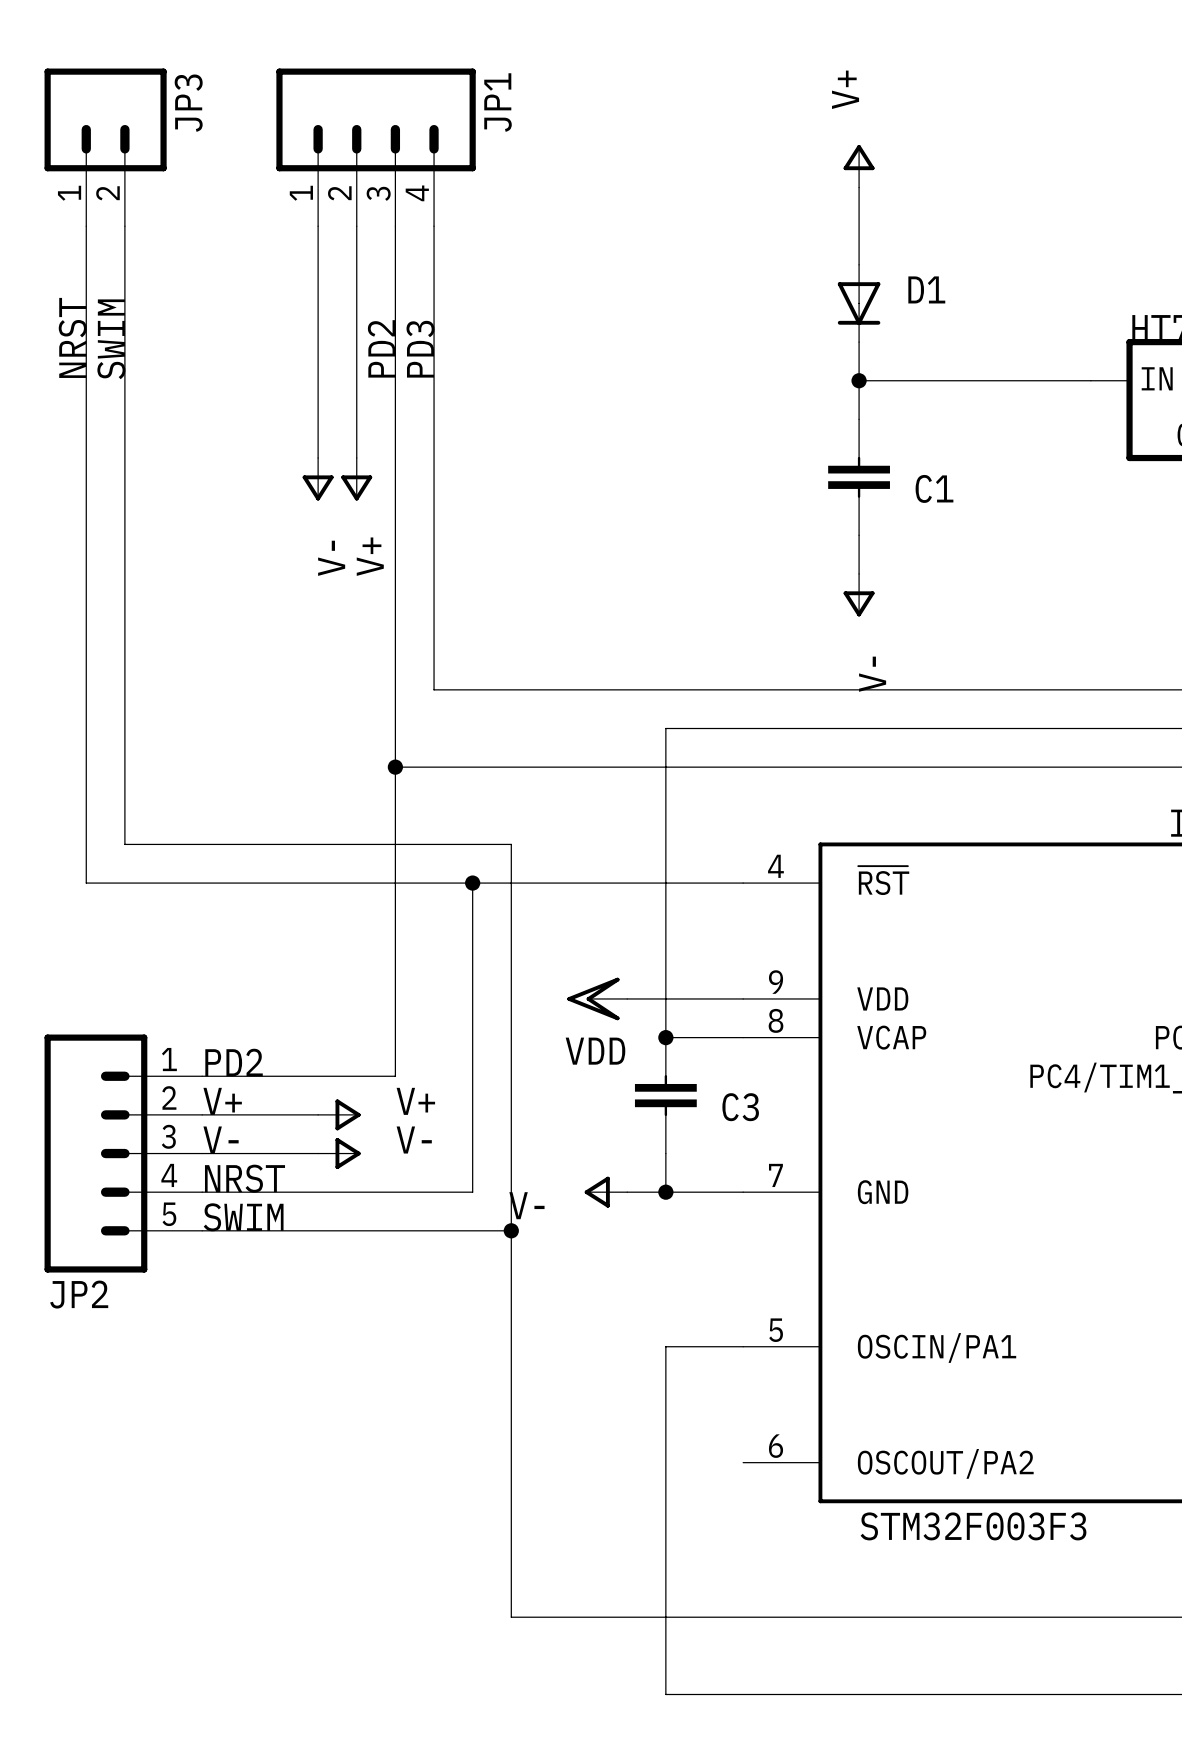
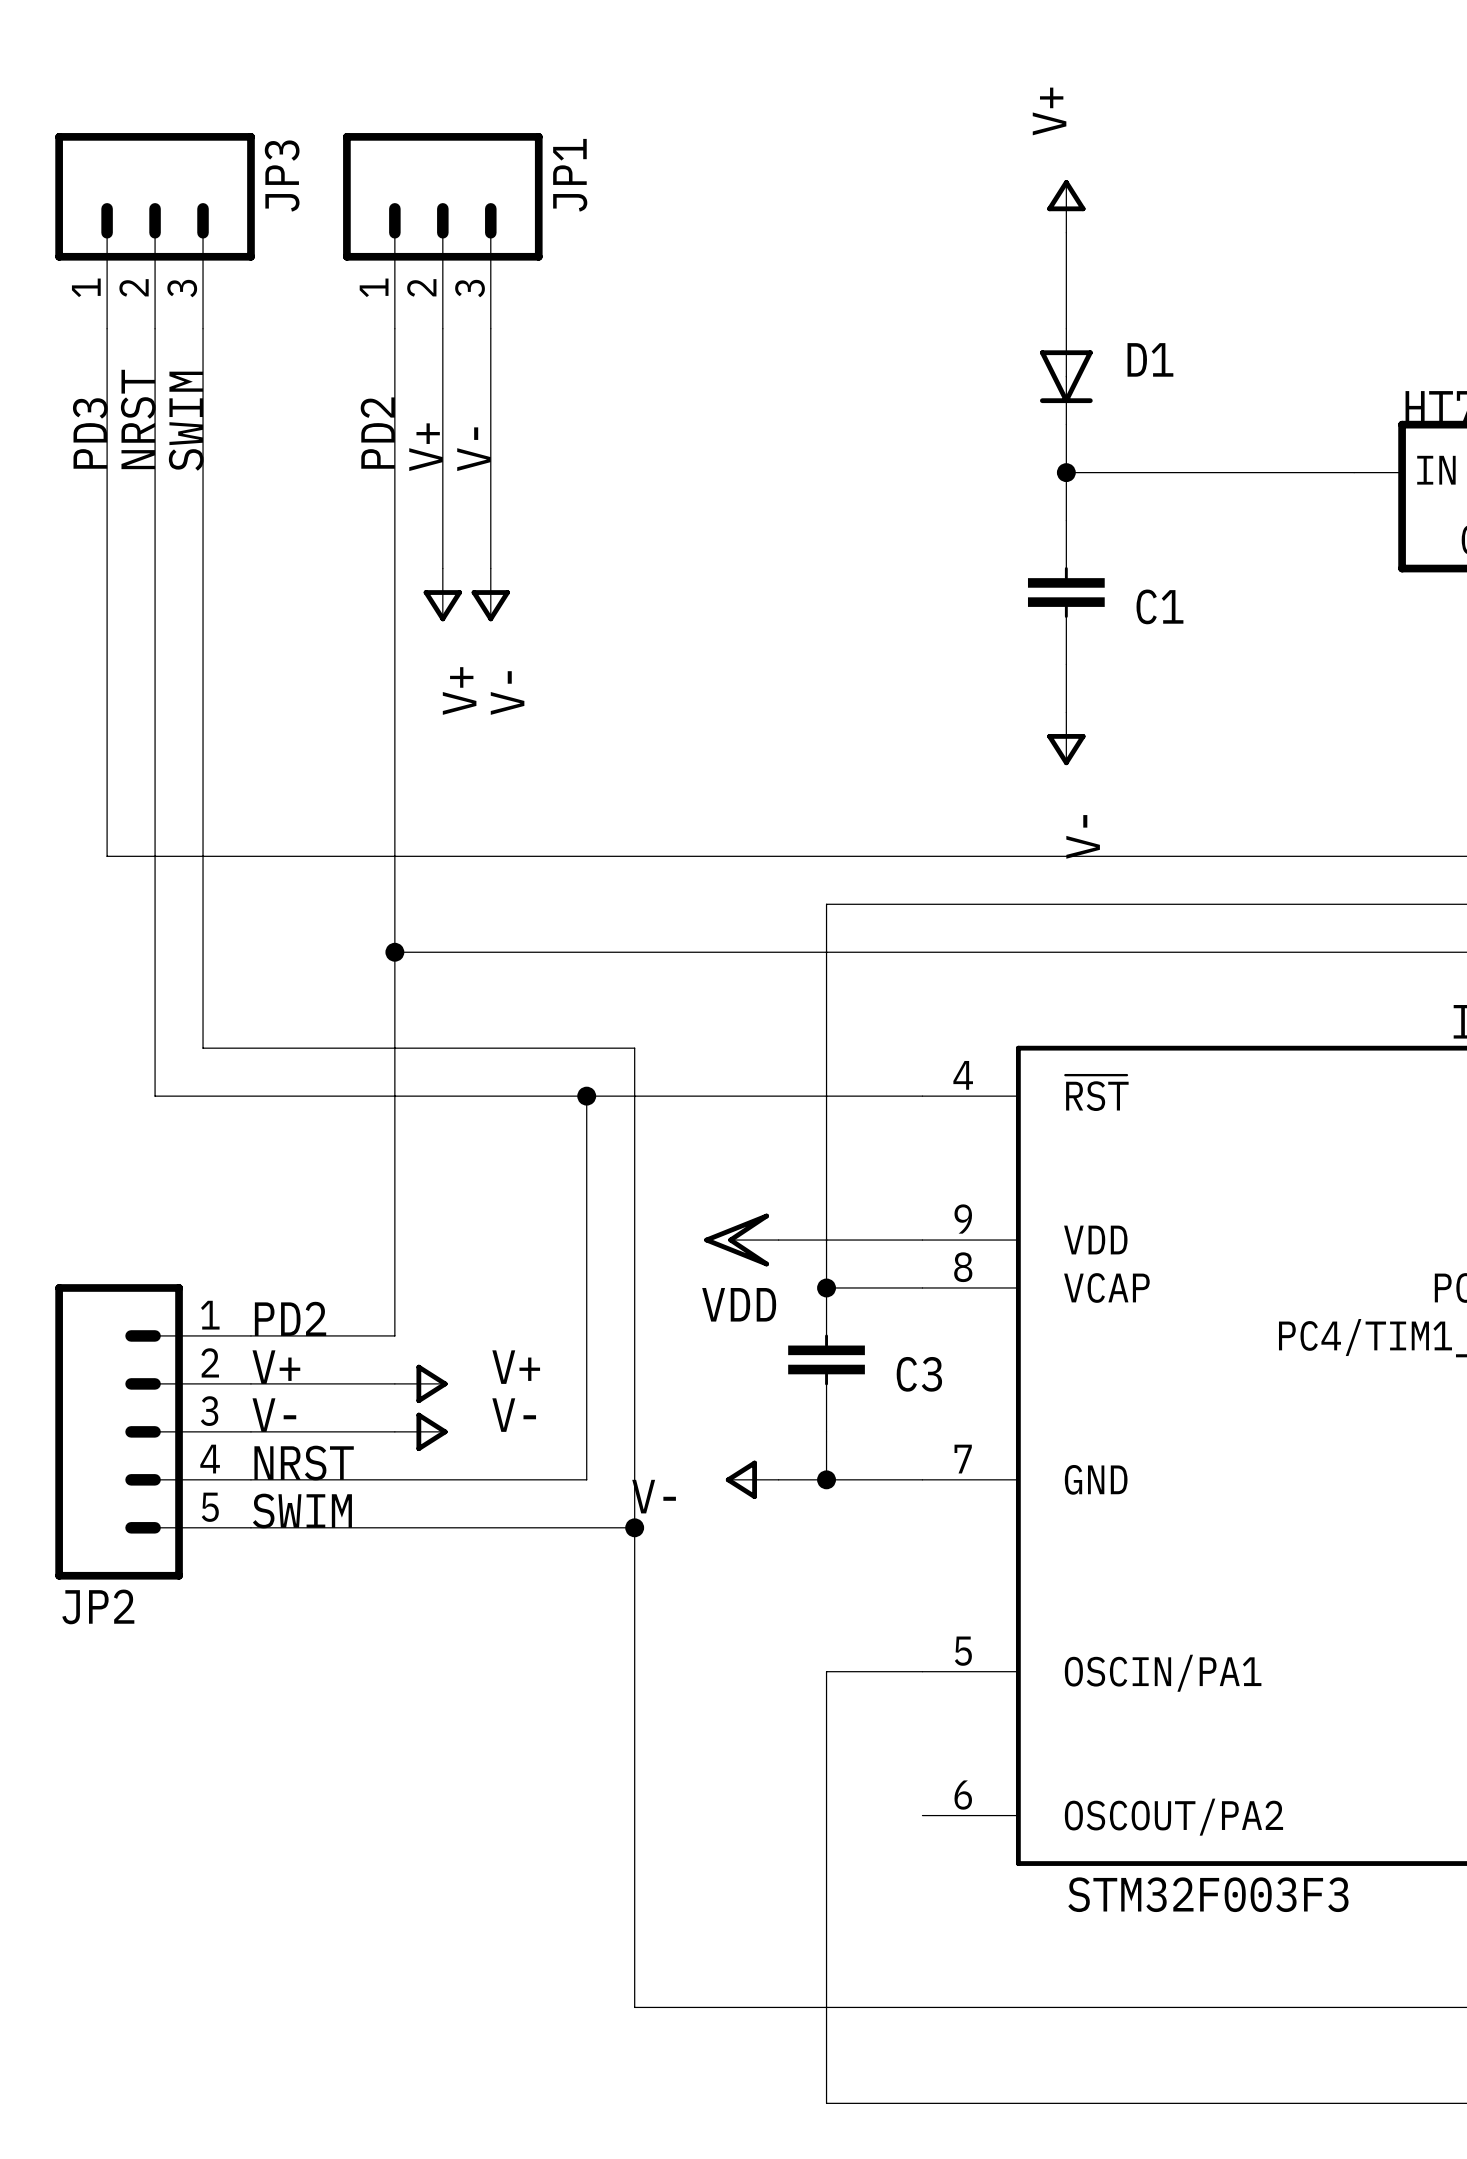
JP3 symbol: [44, 68, 167, 227] -> [55, 133, 255, 329]
JP1 symbol: [276, 68, 476, 227] -> [343, 133, 543, 329]
wire: (434, 226) (434, 689) -> none
wire: none -> (203, 328) (203, 1048)
label: NRST (72, 337) -> PD3 (90, 433)
label: SWIM (111, 339) -> NRST (138, 419)
label: none -> SWIM (186, 421)
label: none -> PD2 (377, 433)
label: PD2 (381, 348) -> V- (474, 449)
label: PD3 (420, 349) -> none
label: none -> V+ (426, 447)
wire: (395, 458) (395, 1076) (318, 1076) -> (394, 568) (394, 1335)
power symbol position: V- (318, 479) -> V- (490, 594)
wire: (86, 689) (86, 883) (124, 883) -> (107, 856) (538, 856)
wire: none -> (394, 952) (490, 952)
junction position: (395, 767) -> (394, 952)
wire: (124, 844) (163, 844) -> (155, 1048) (155, 1096)

